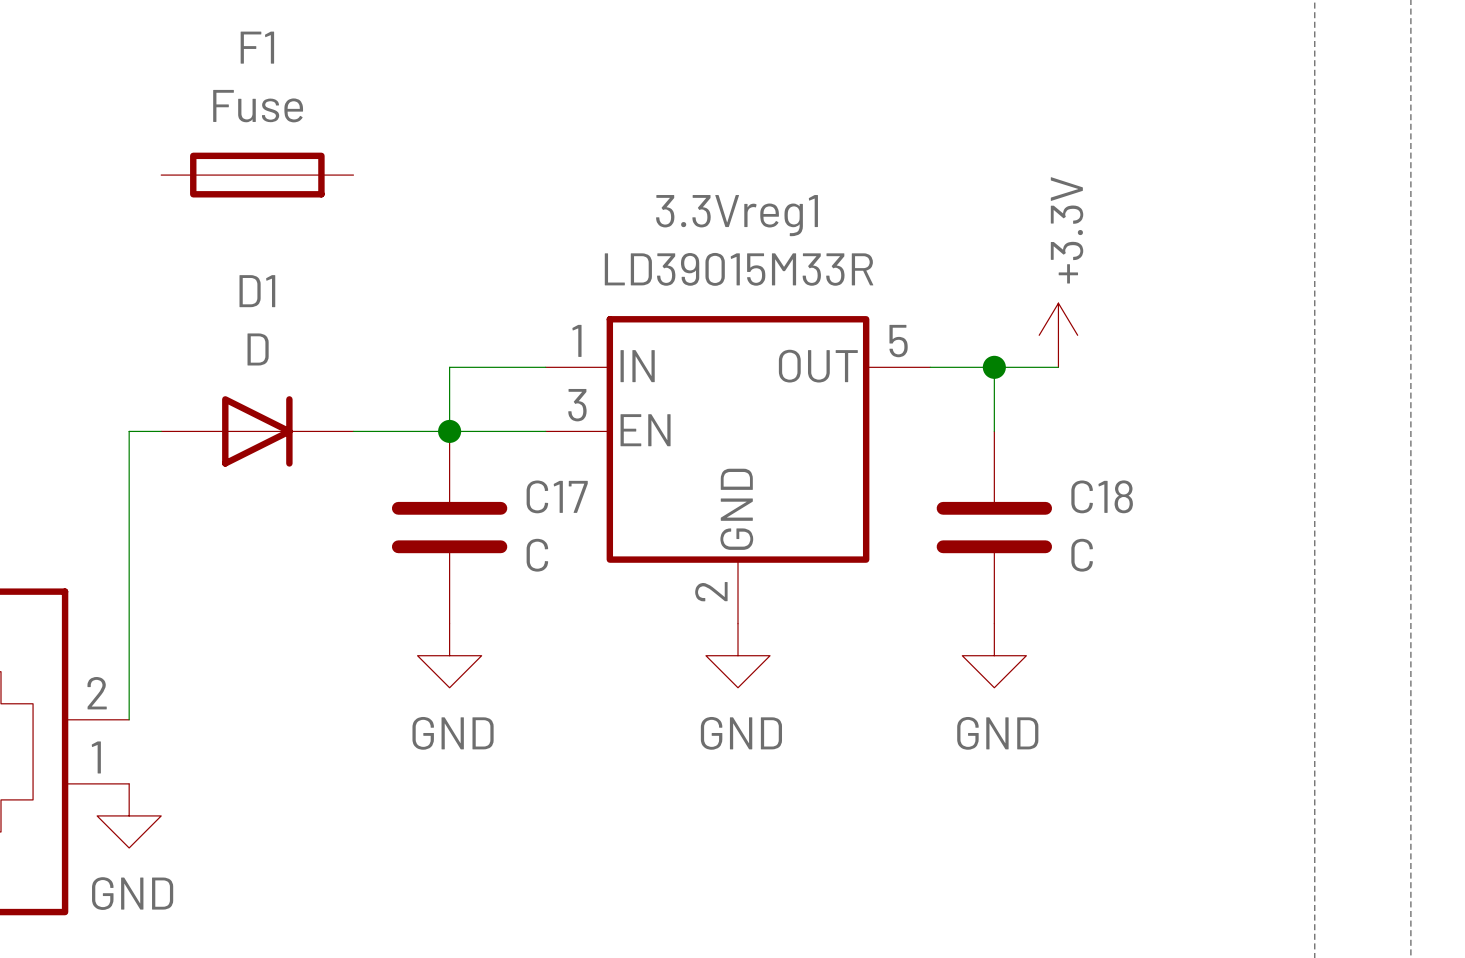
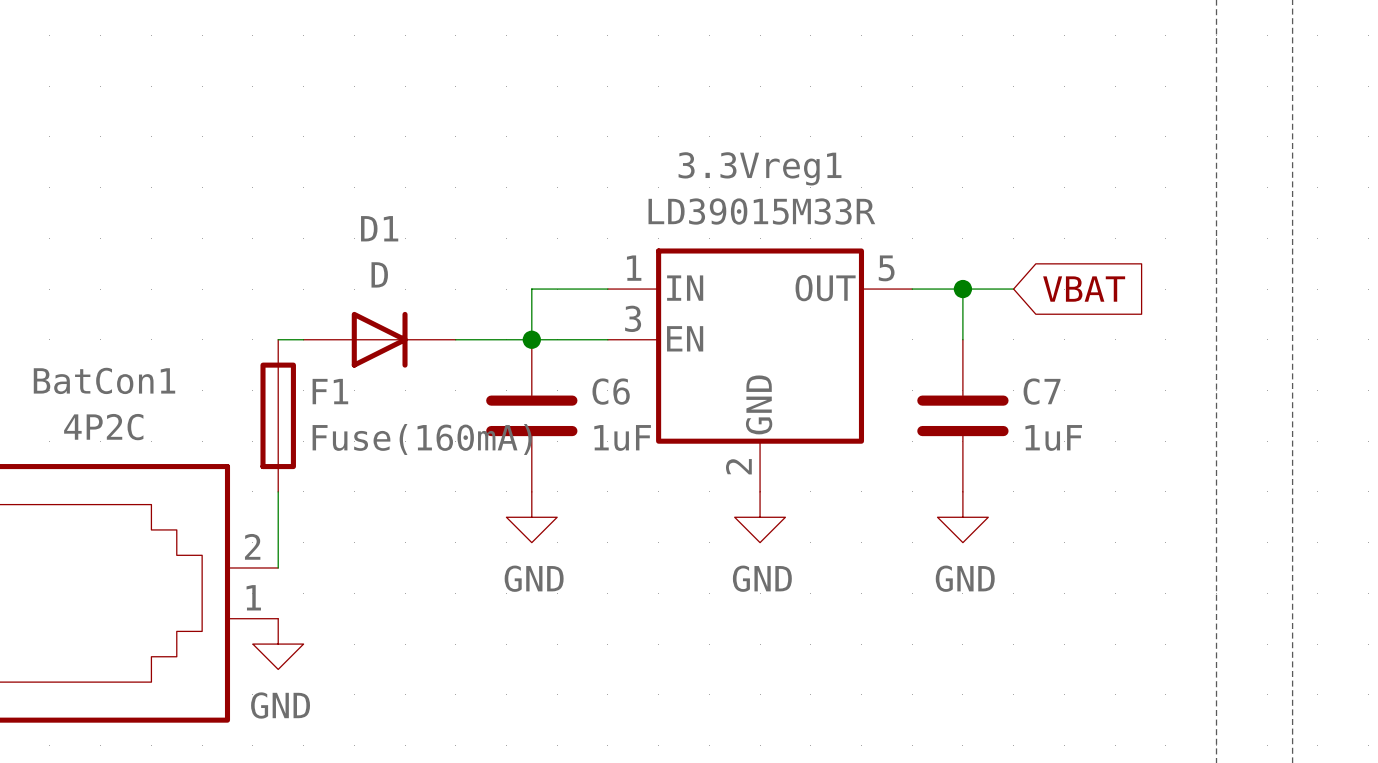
F1 name position: F1 (257, 47) -> F1 (330, 391)
F1 value: Fuse (258, 106) -> Fuse(160mA) (422, 439)
F1 rotation: 0° (257, 175) -> 90° clockwise (278, 415)
F1 position: (257, 175) -> (278, 415)
power symbol: +3.3V (1058, 335) -> none
global label: none -> VBAT (1084, 289)
C17 name: C17 (557, 496) -> C6 (611, 391)
C18 name: C18 (1102, 496) -> C7 (1042, 391)
C17 value: C (537, 555) -> 1uF (622, 437)
C18 value: C (1082, 555) -> 1uF (1053, 437)

